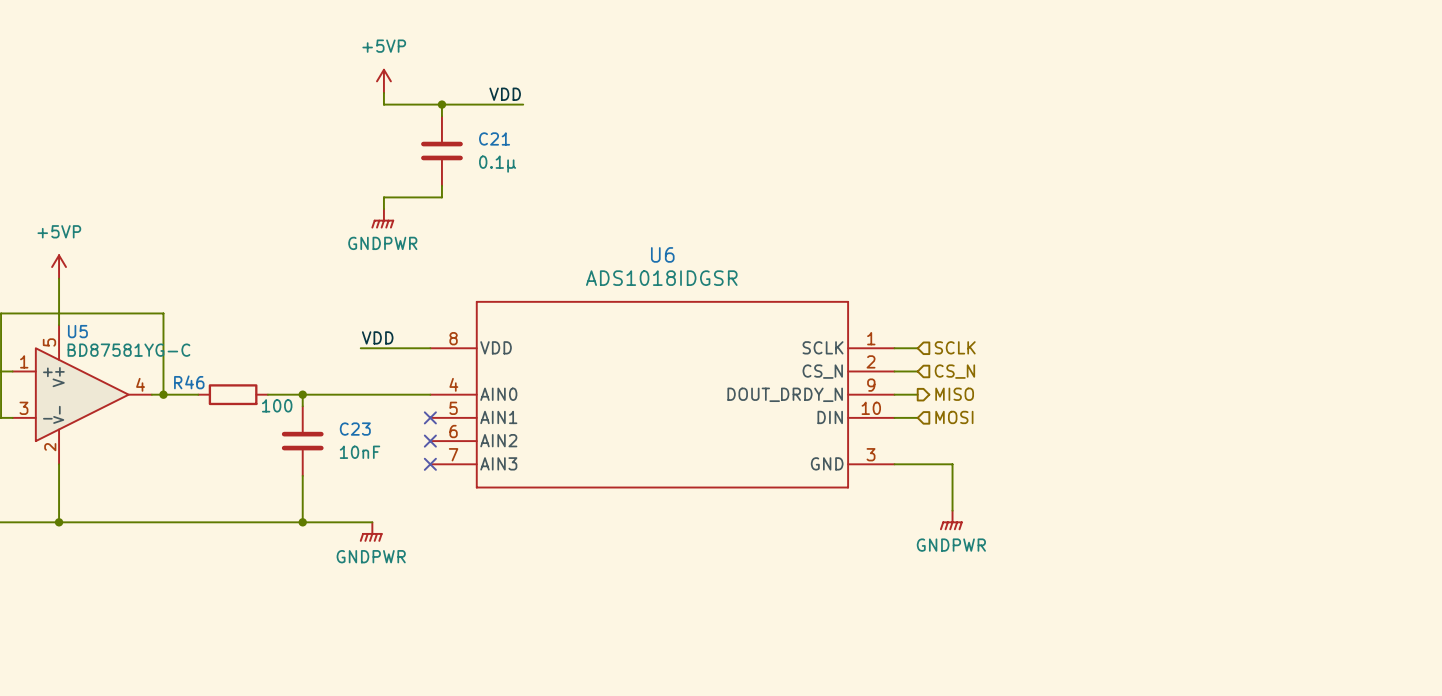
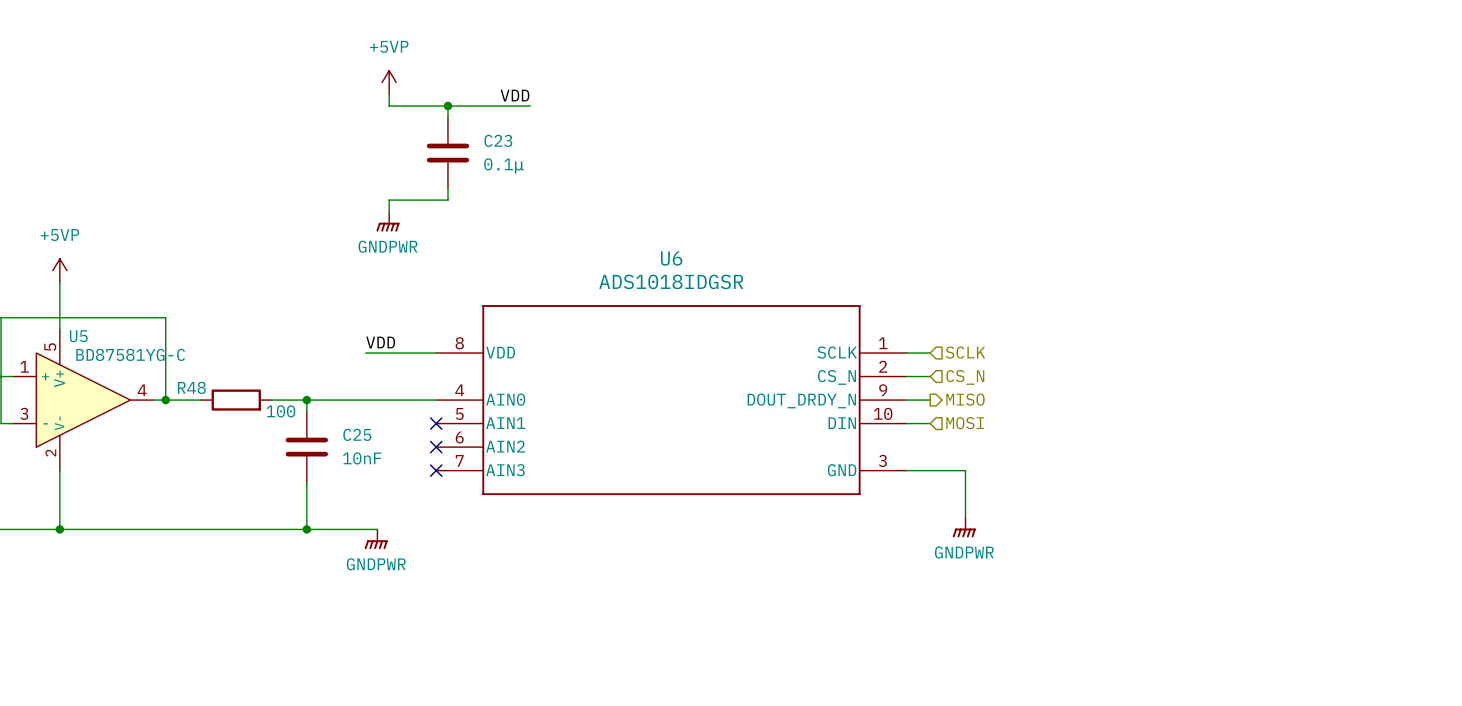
C21 name: C21 (494, 138) -> C23 (498, 140)
R46 name: R46 (189, 382) -> R48 (191, 387)
C23 name: C23 (355, 429) -> C25 (357, 434)

